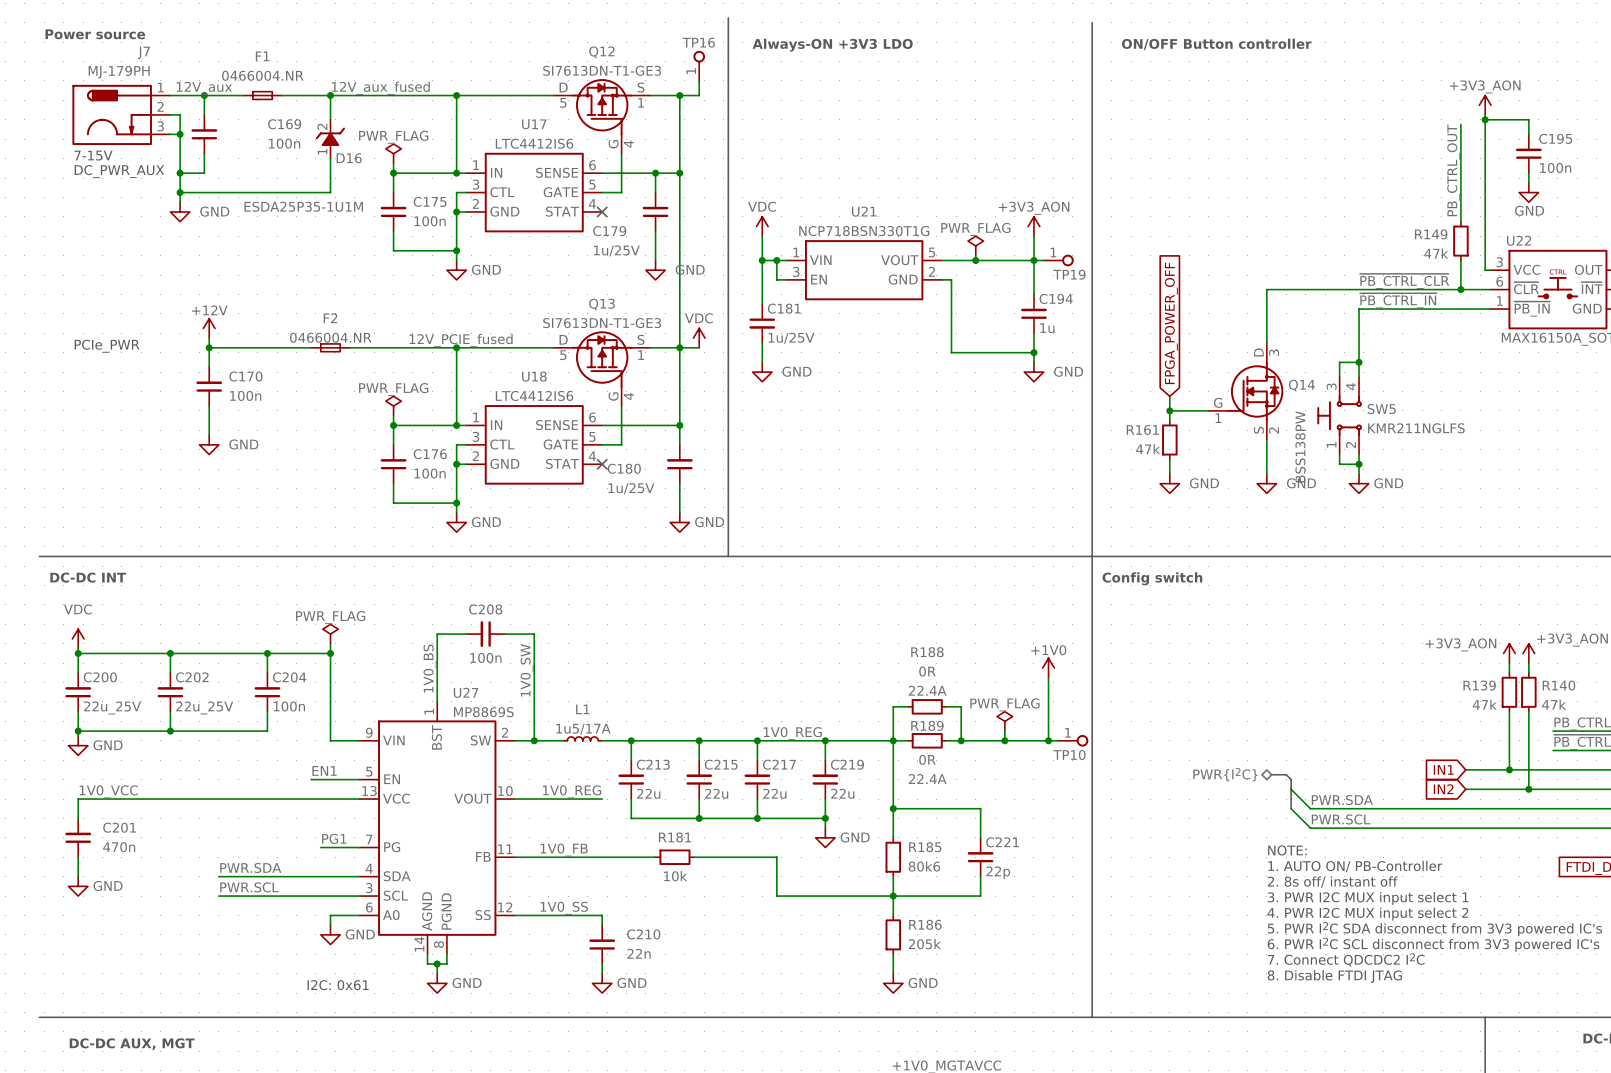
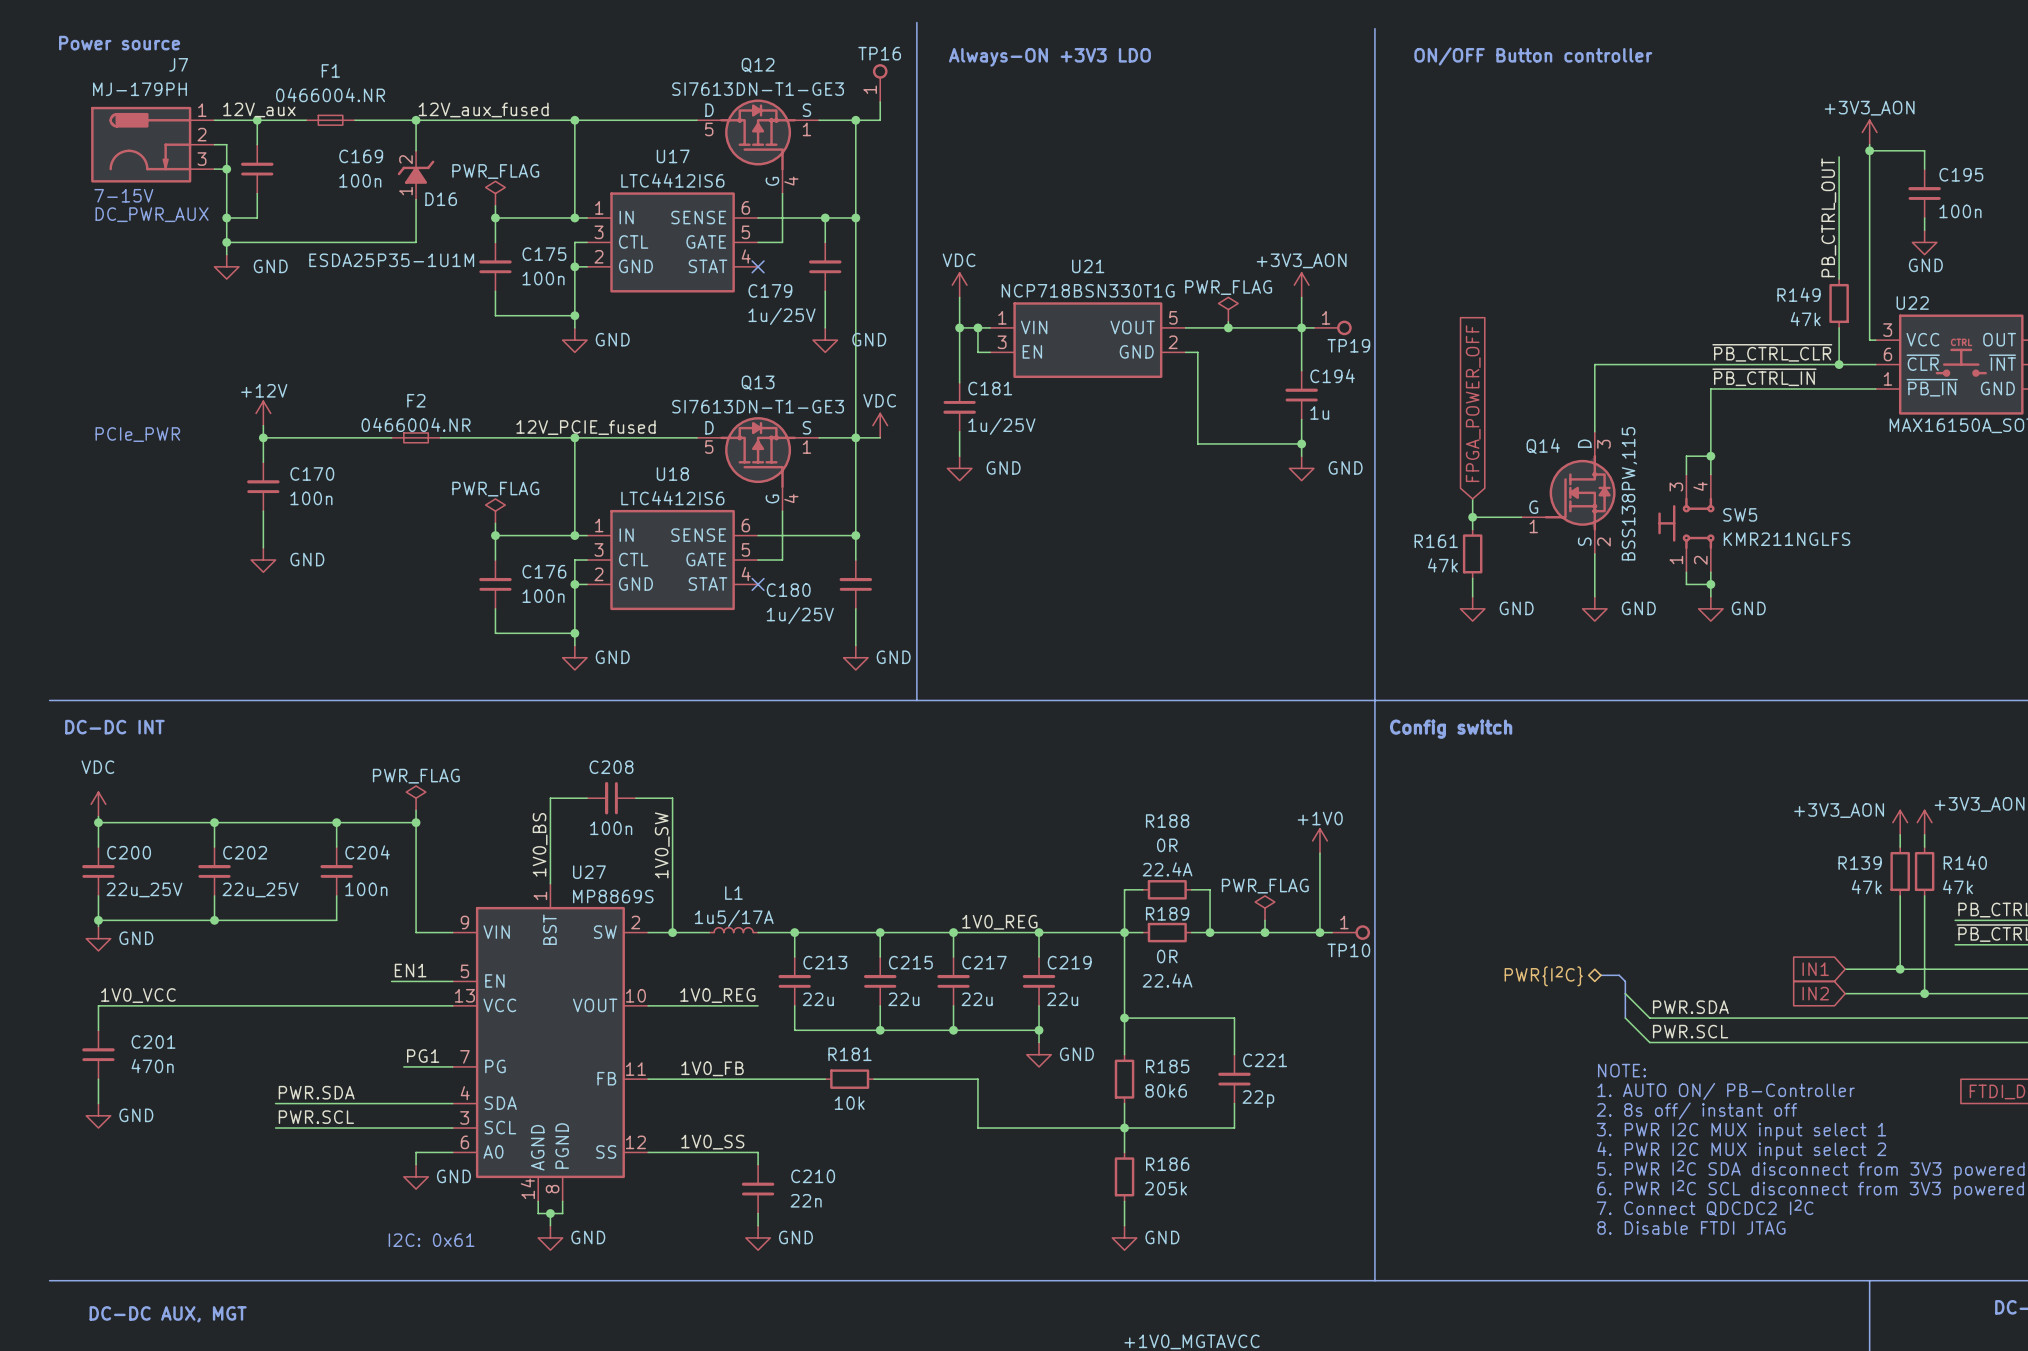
Q14 name position: Q14 (1301, 385) -> Q14 (1543, 446)
Q14 text: none -> BSS138PW,115 (1629, 493)
Q14 value: BSS138PW (1300, 446) -> none

